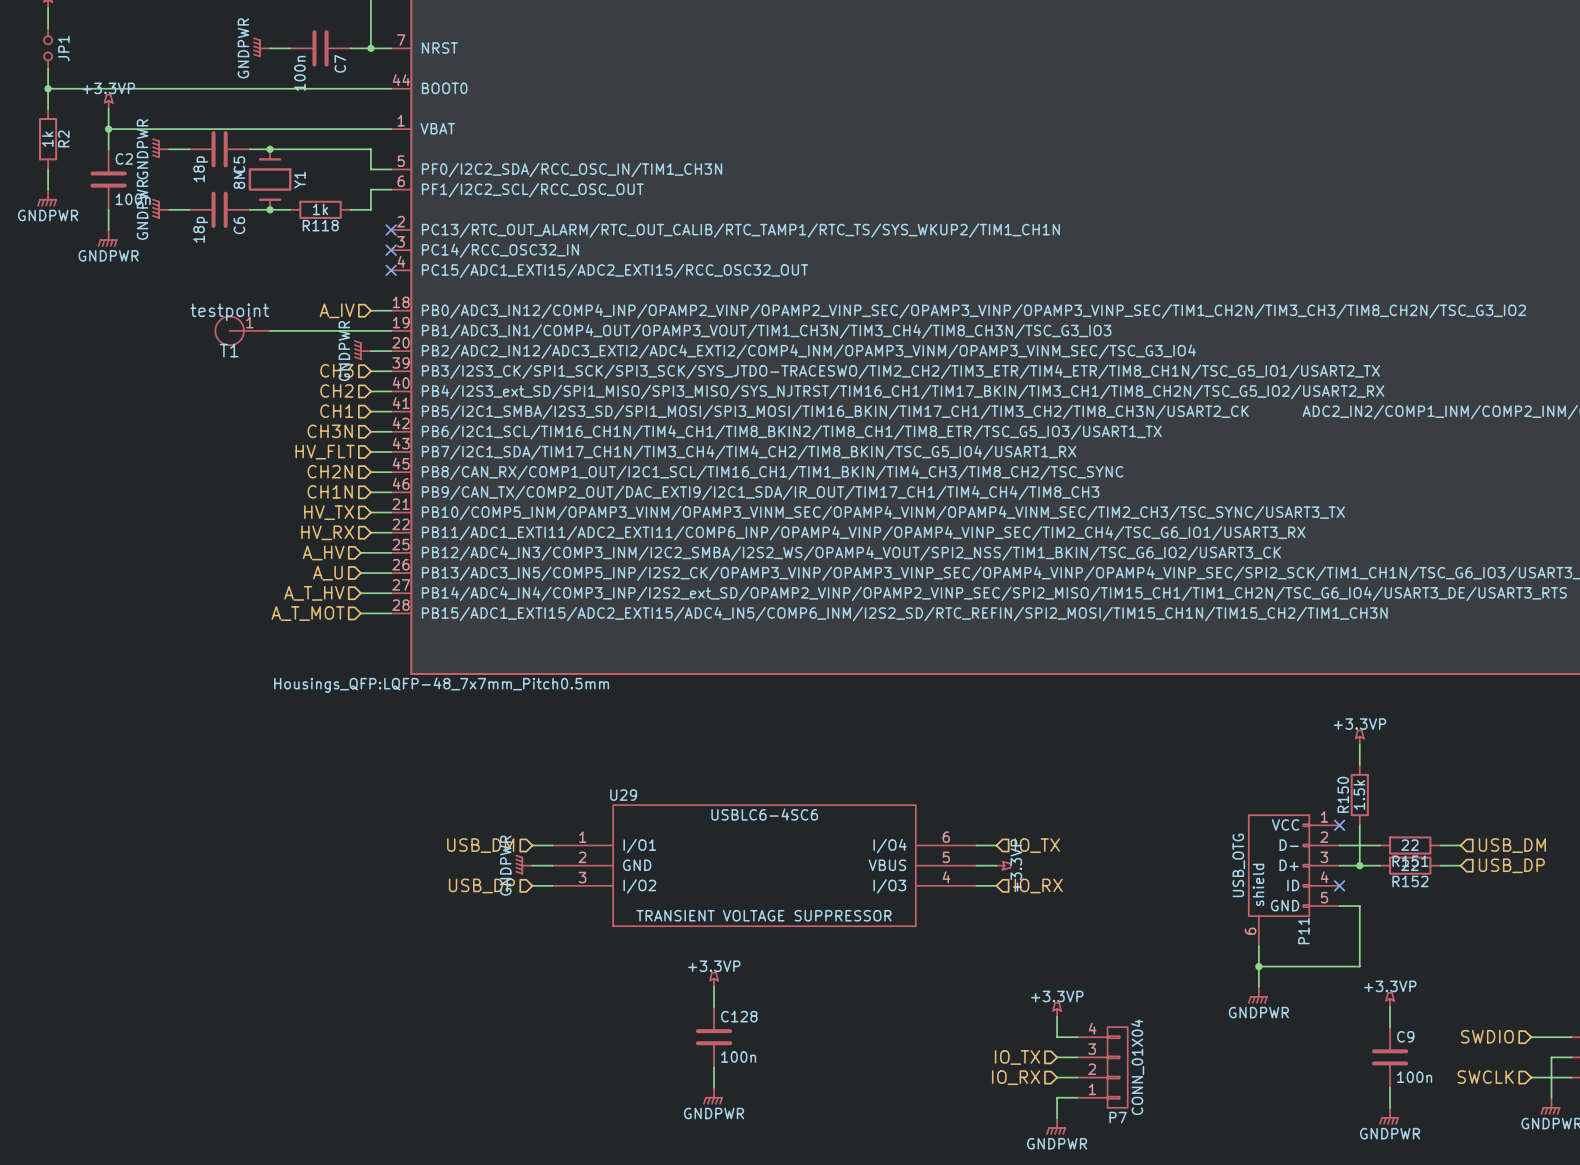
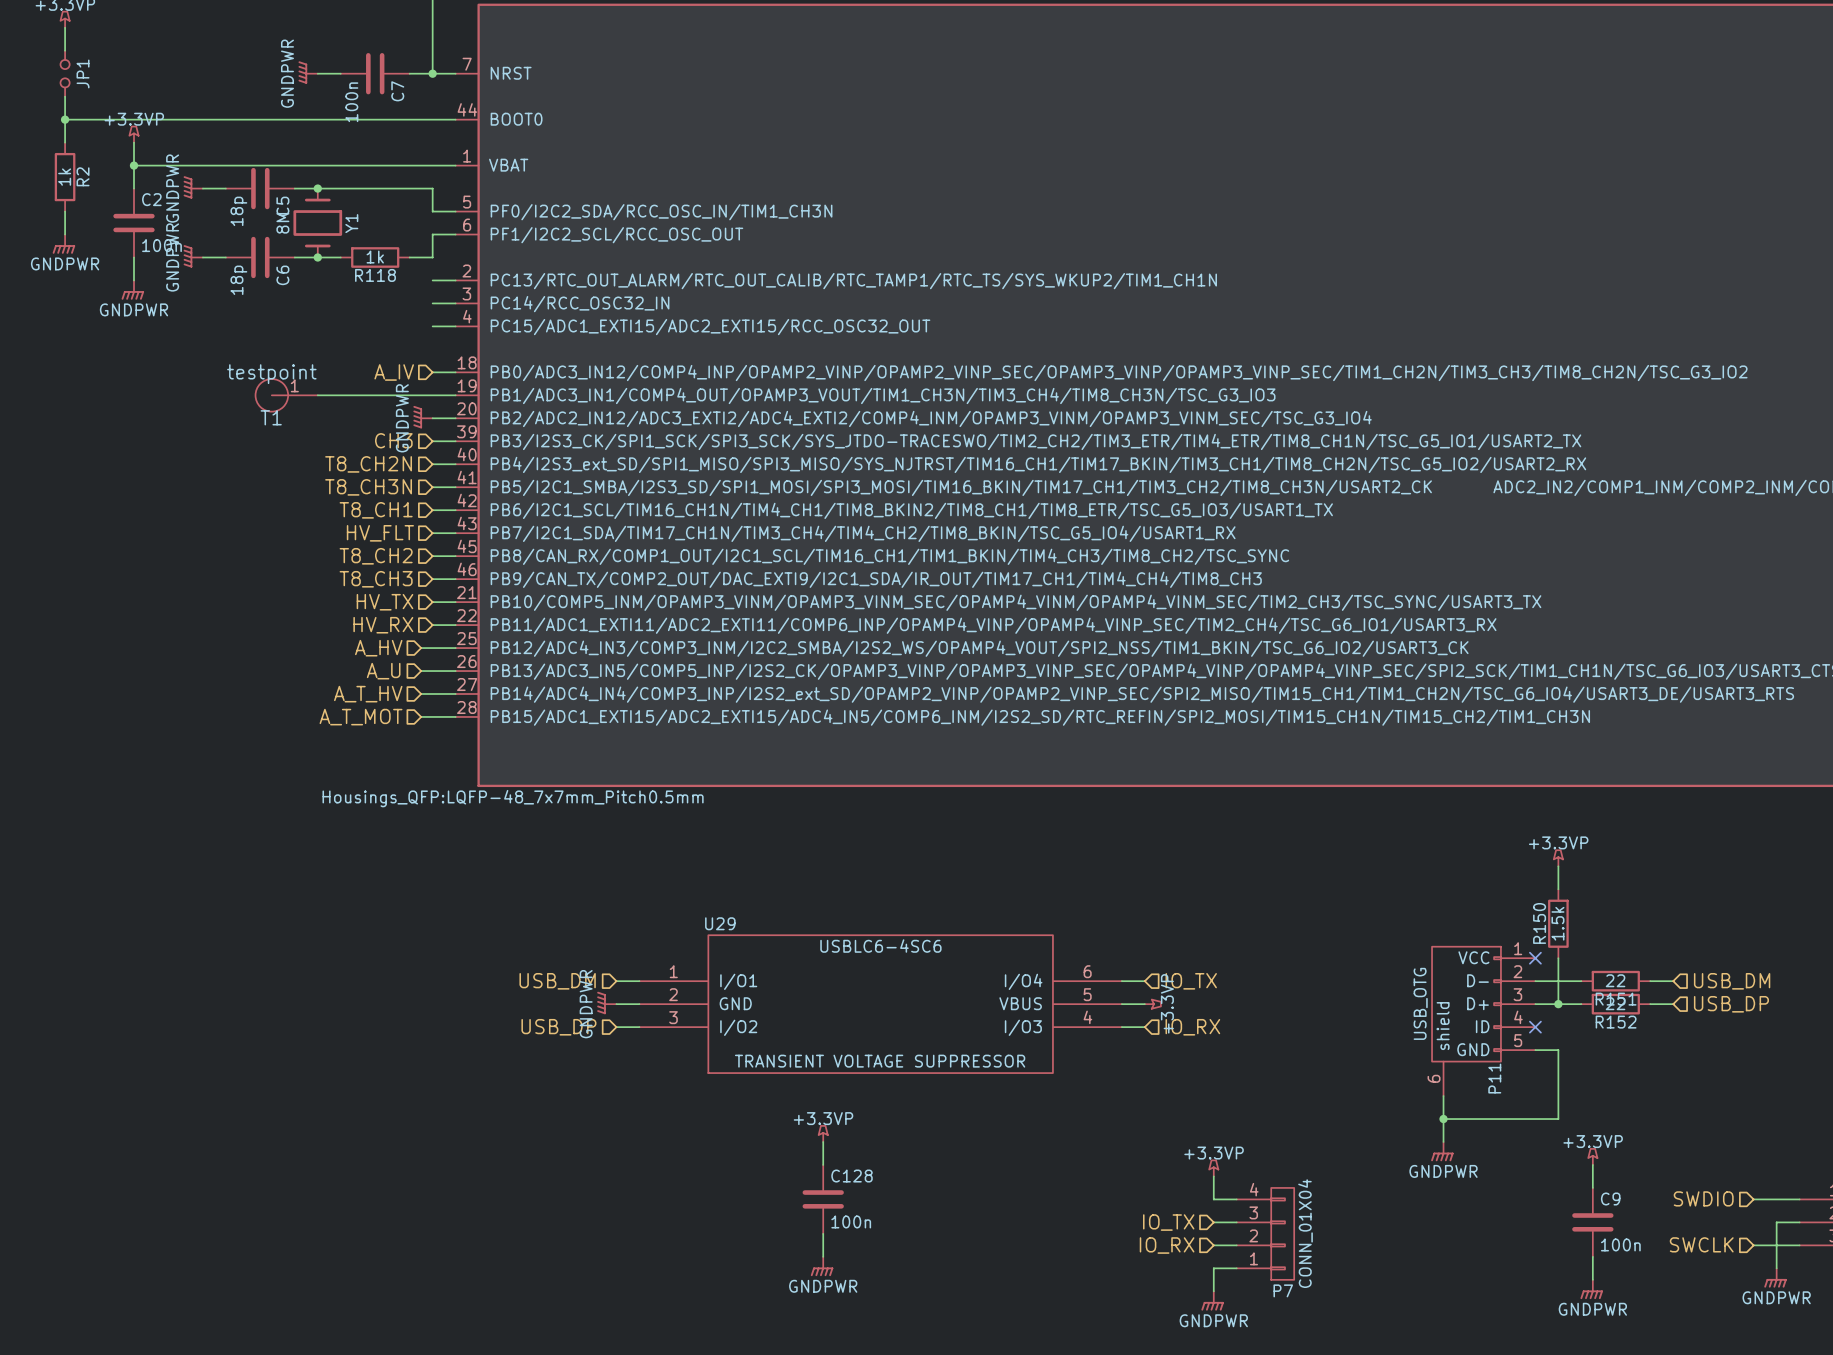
wire: none -> (432, 280) (455, 280)
no-connect mark: (391, 230) -> none
wire: none -> (432, 303) (455, 303)
no-connect mark: (391, 250) -> none
wire: none -> (432, 326) (455, 326)
no-connect mark: (391, 270) -> none
hierarchical label: CH2 (336, 390) -> T8_CH2N (368, 464)
hierarchical label: CH1 (336, 411) -> T8_CH3N (368, 487)
hierarchical label: CH3N (330, 431) -> T8_CH1 (376, 510)
hierarchical label: CH2N (330, 471) -> T8_CH2 (376, 556)
hierarchical label: CH1N (330, 491) -> T8_CH3 (376, 579)

